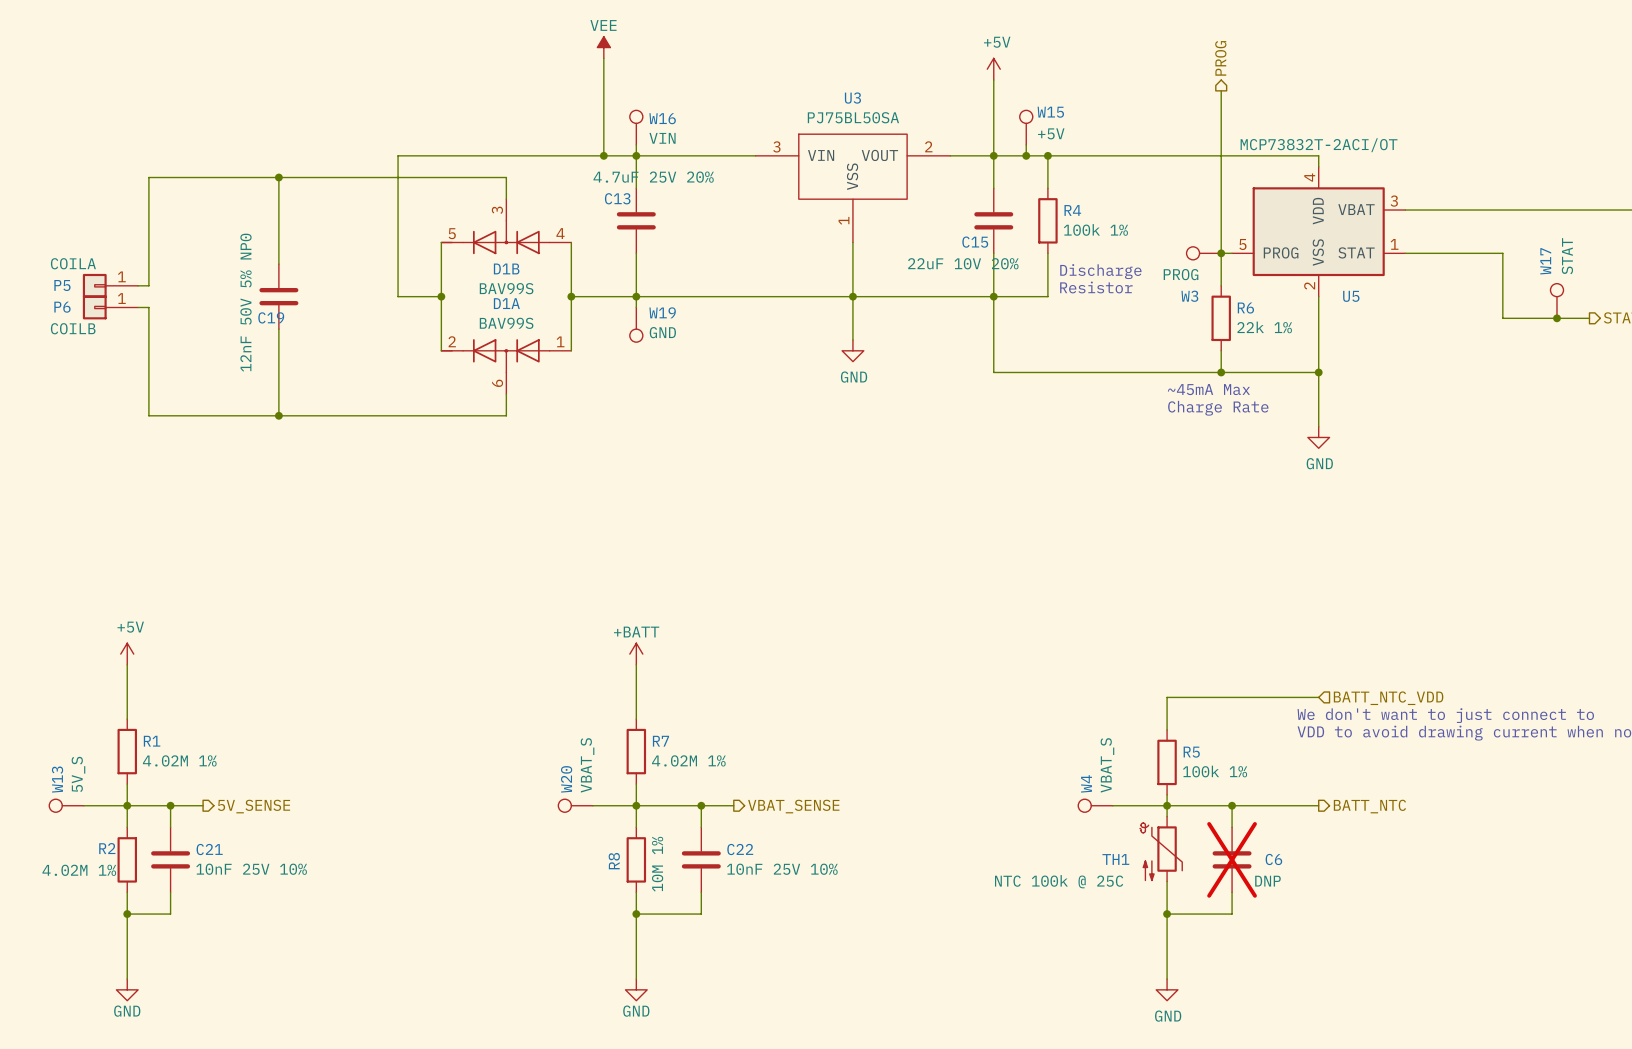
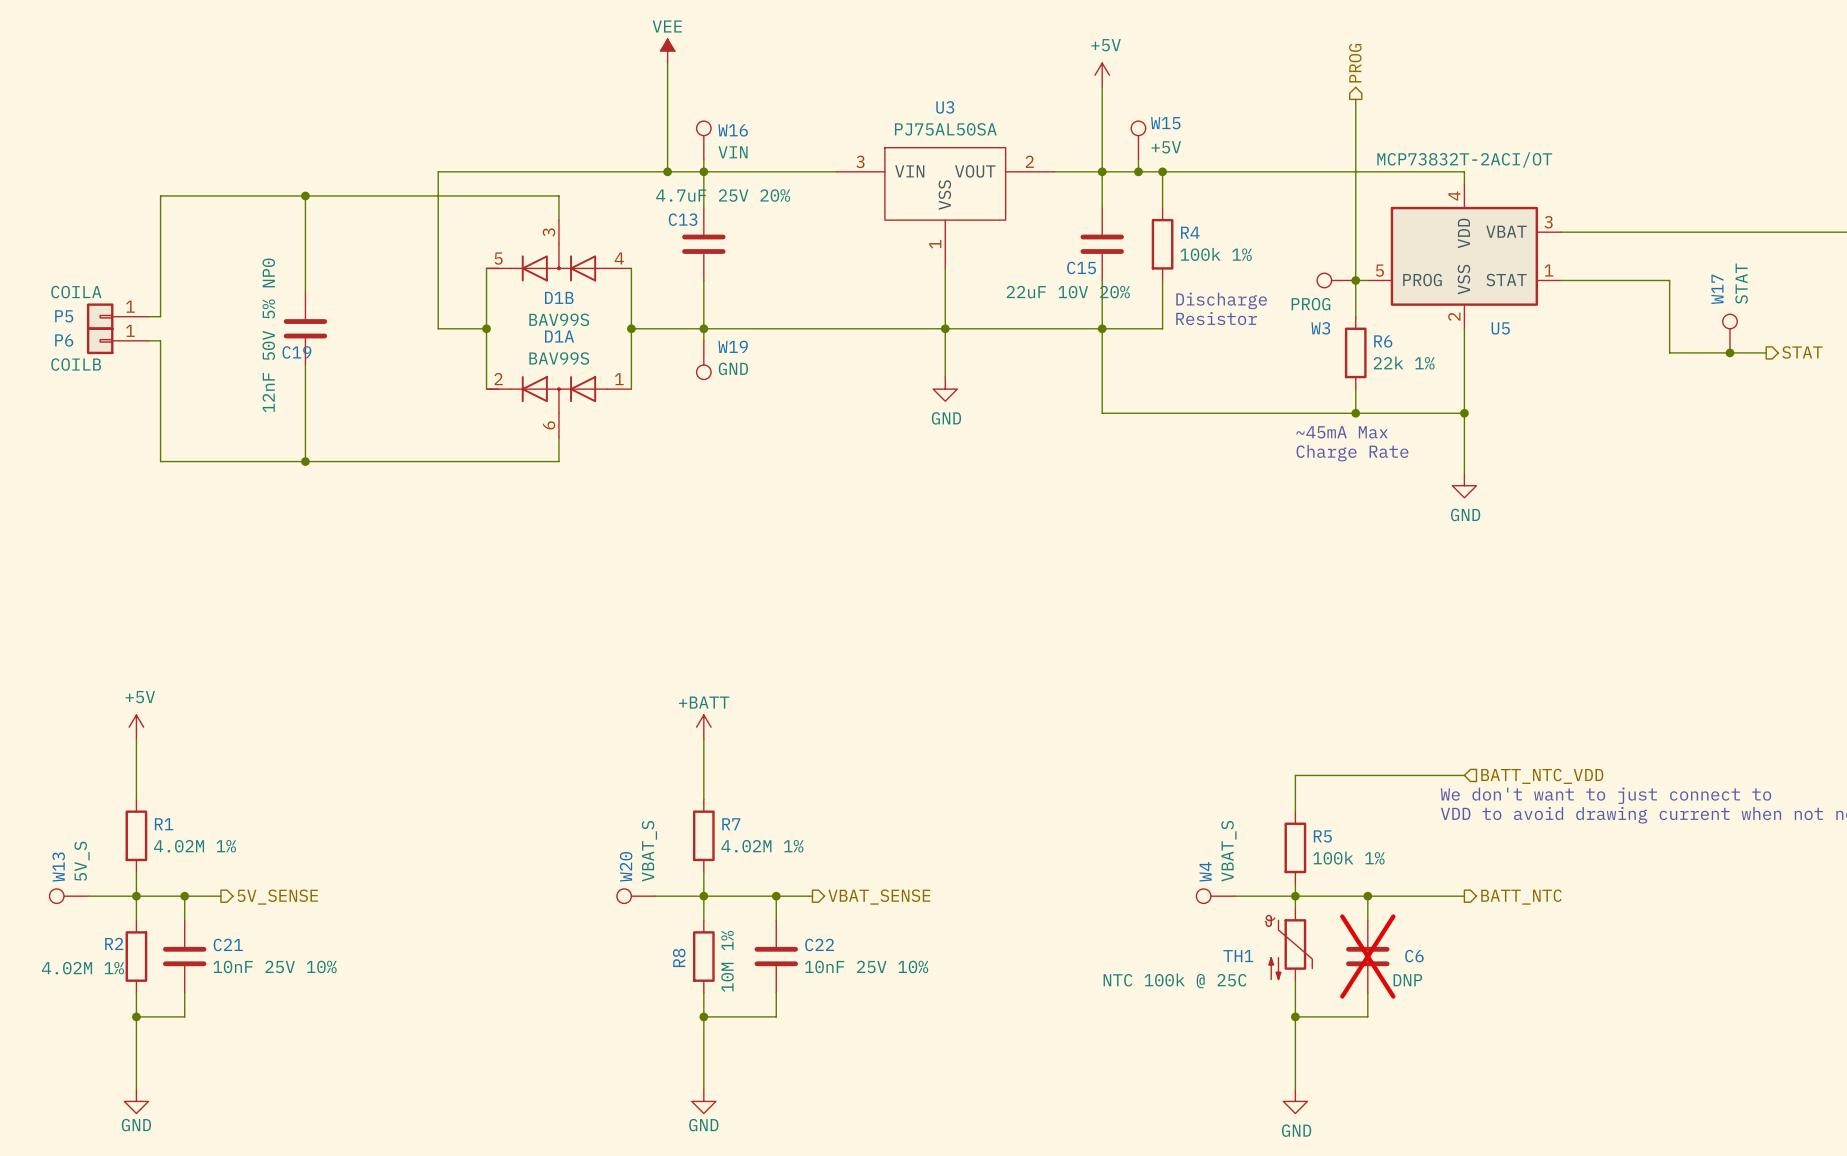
U3 value: PJ75BL50SA (853, 117) -> PJ75AL50SA (945, 129)

